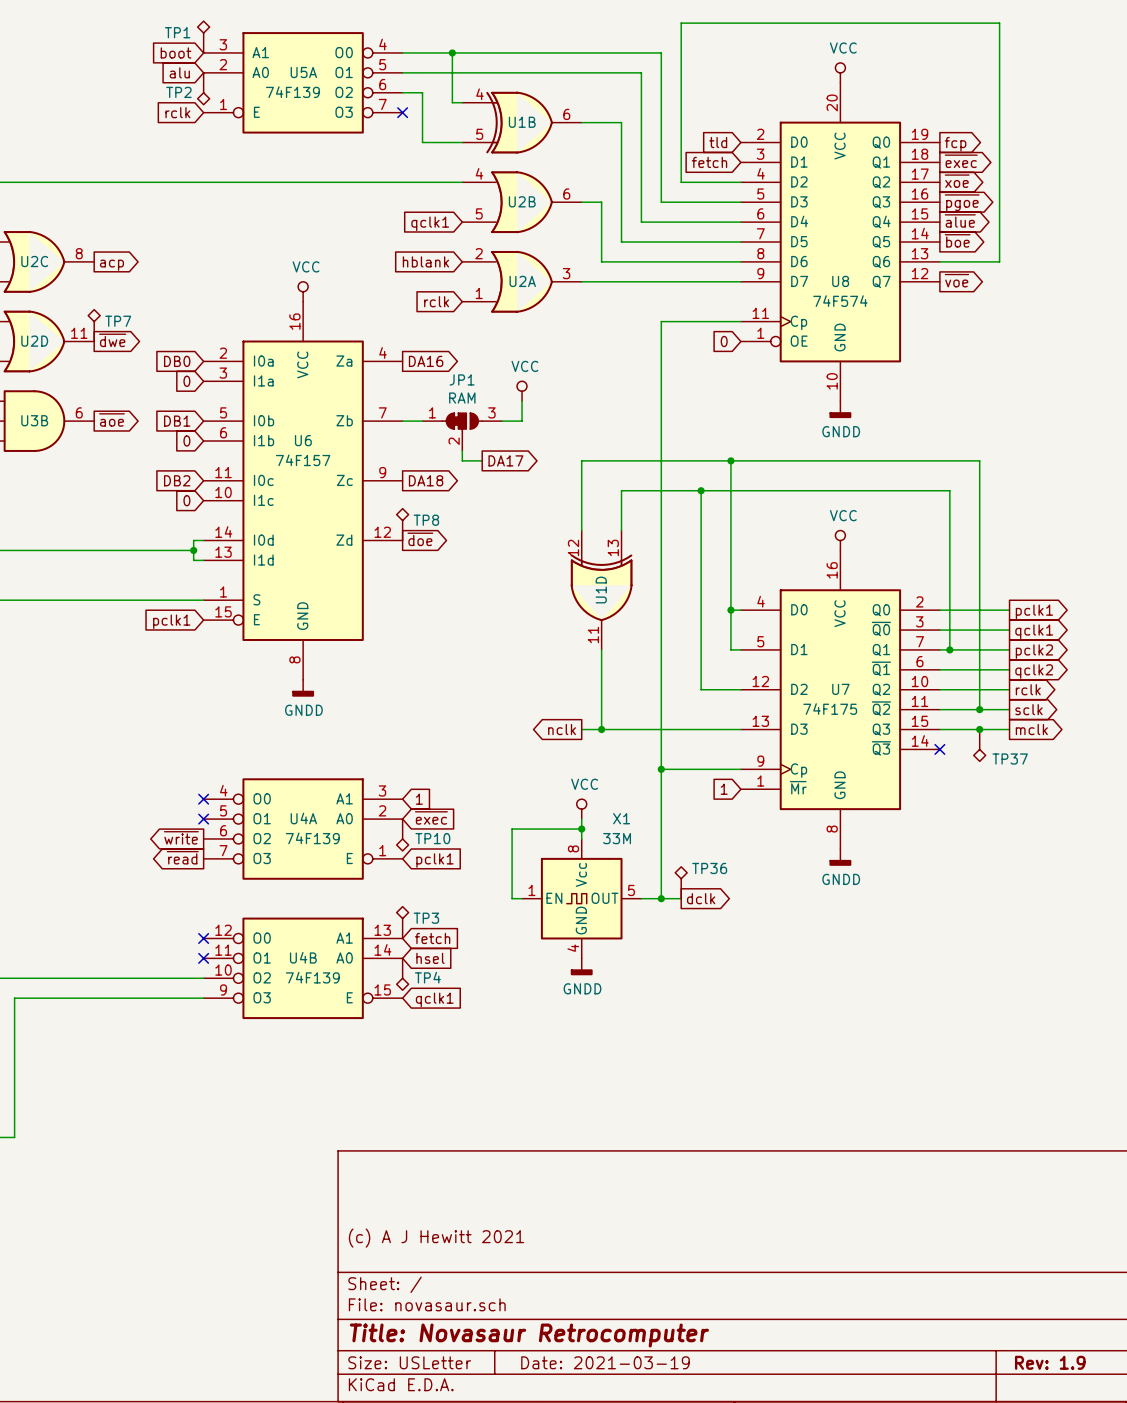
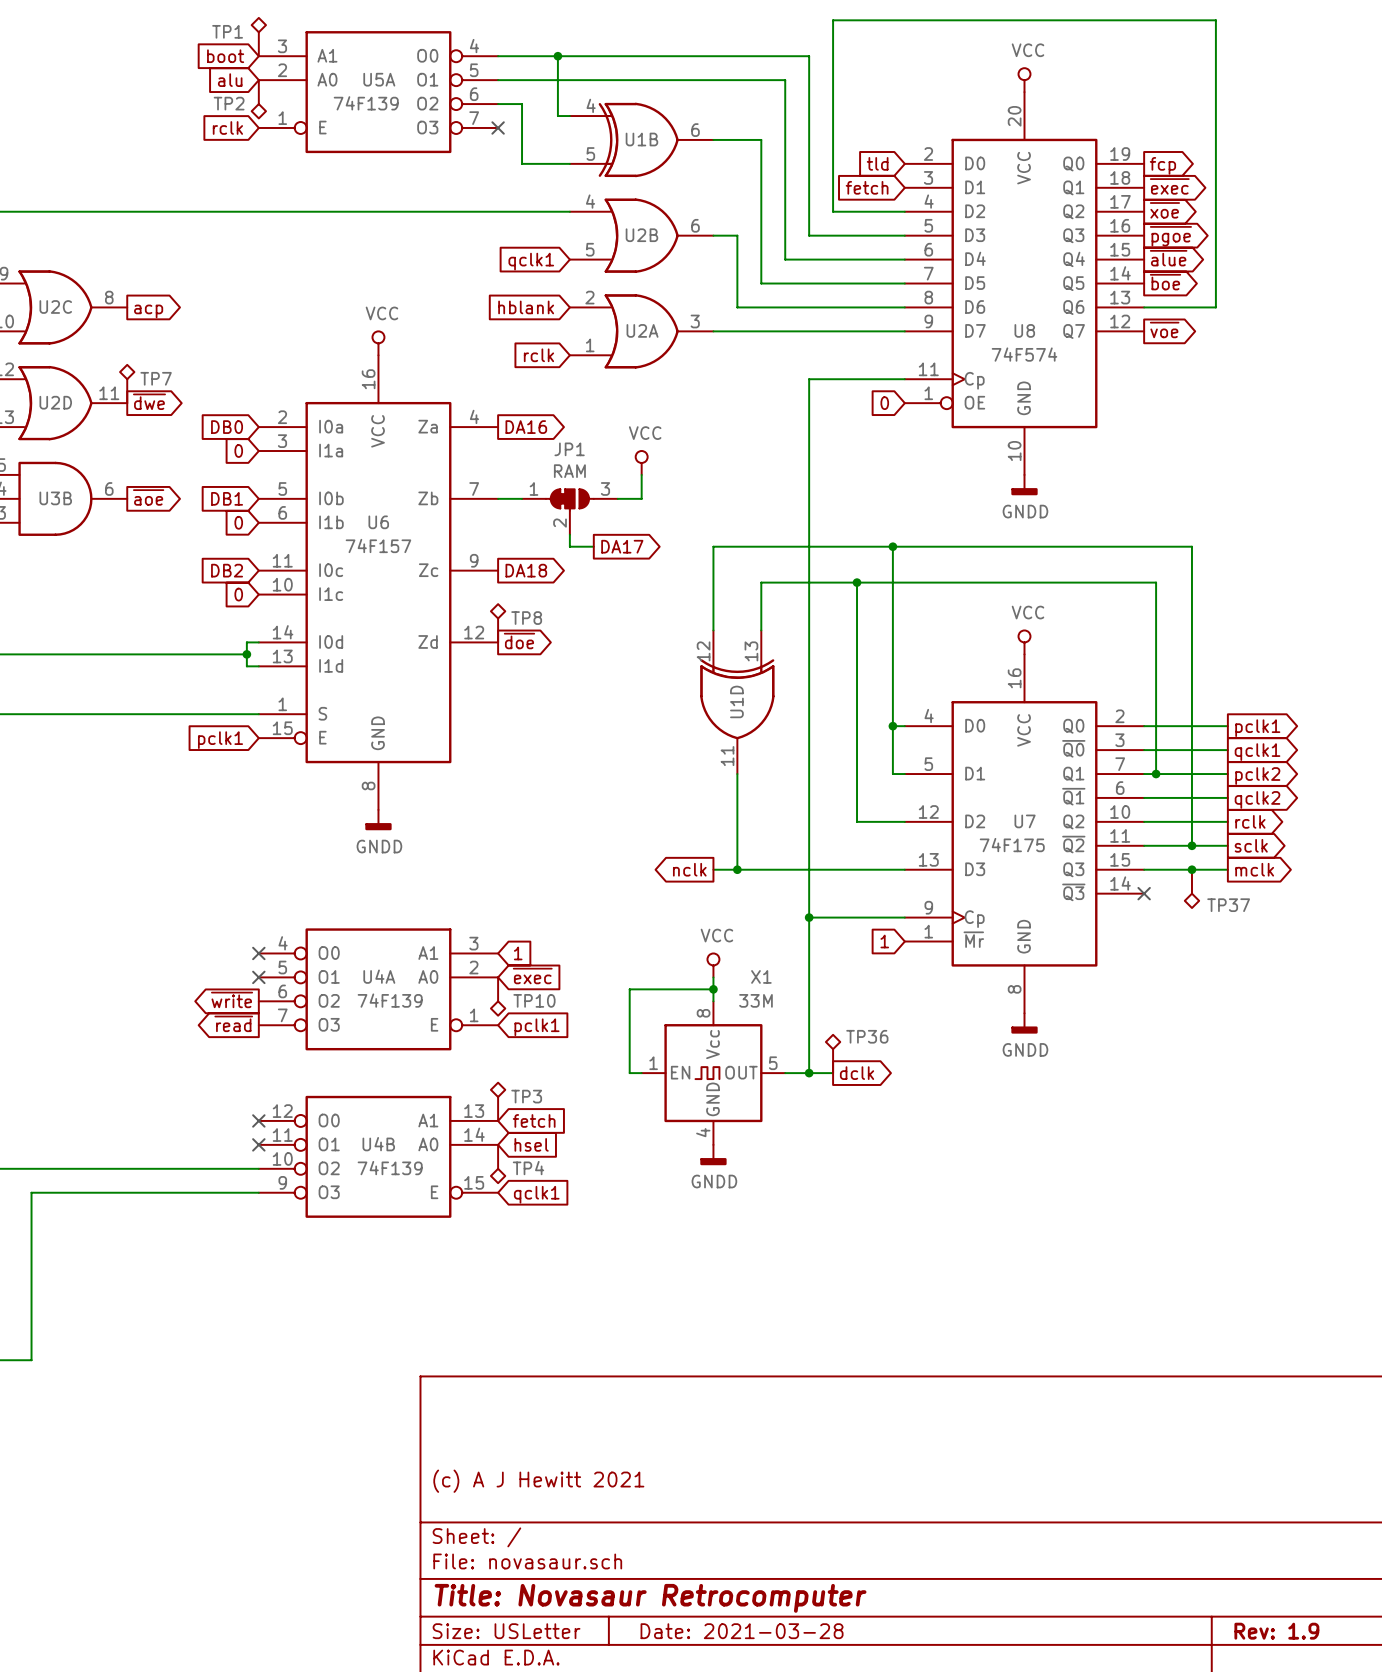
title block: Date: 2021-03-19 (605, 1362) -> Date: 2021-03-28 (742, 1631)

